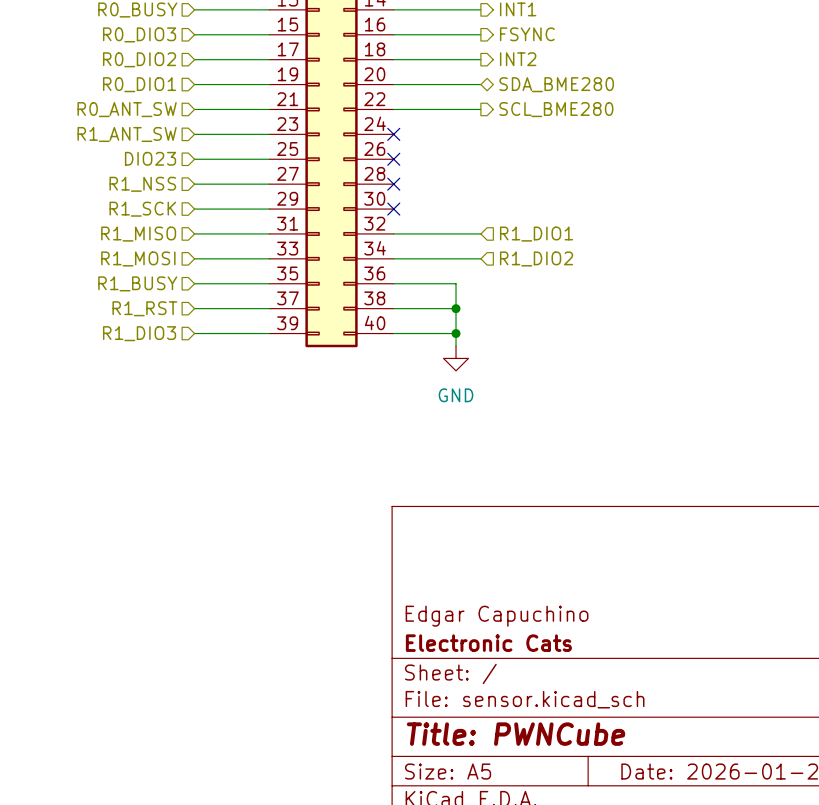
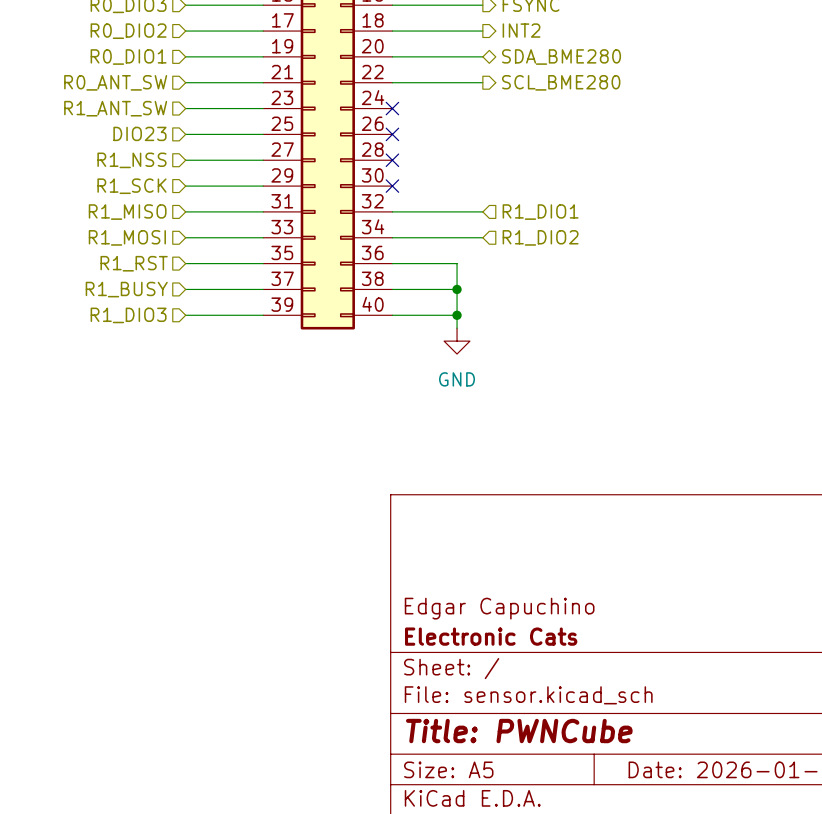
hierarchical label: R1_BUSY (137, 283) -> R1_RST (134, 263)
hierarchical label: R1_RST (144, 308) -> R1_BUSY (126, 289)

